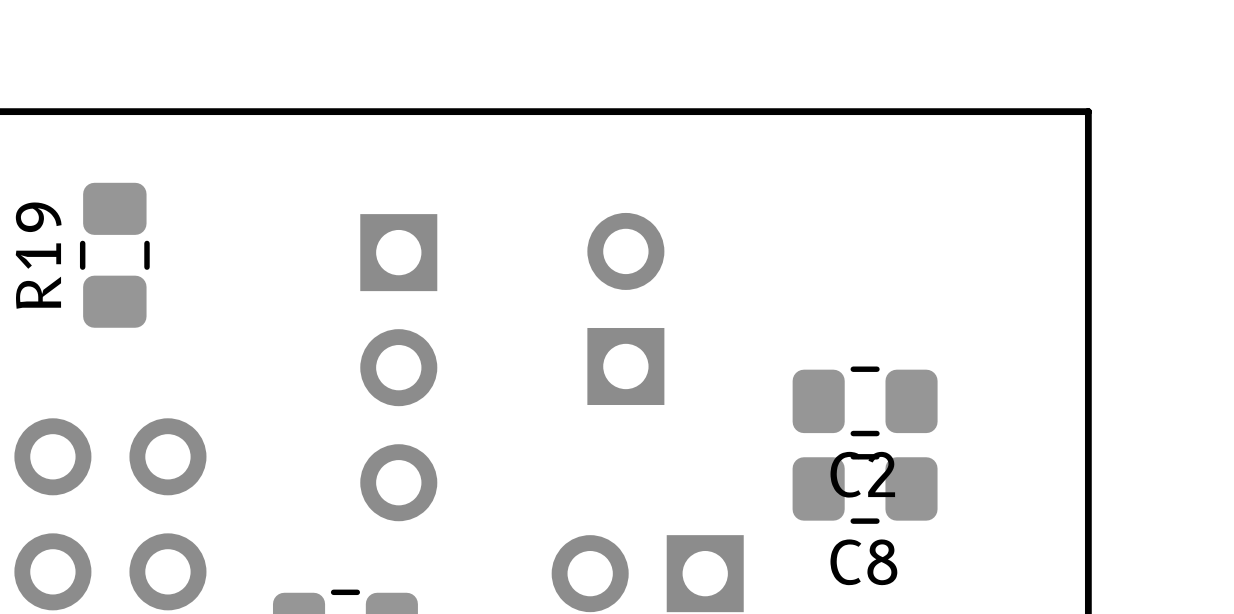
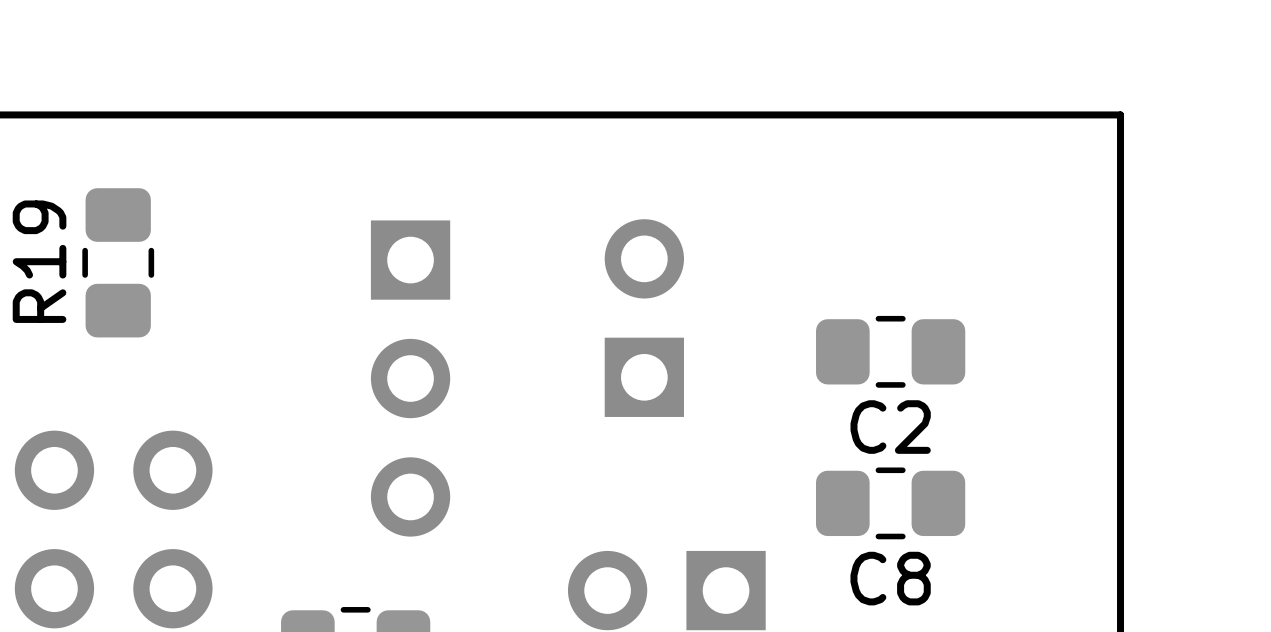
C2 position: (865, 401) -> (890, 351)

